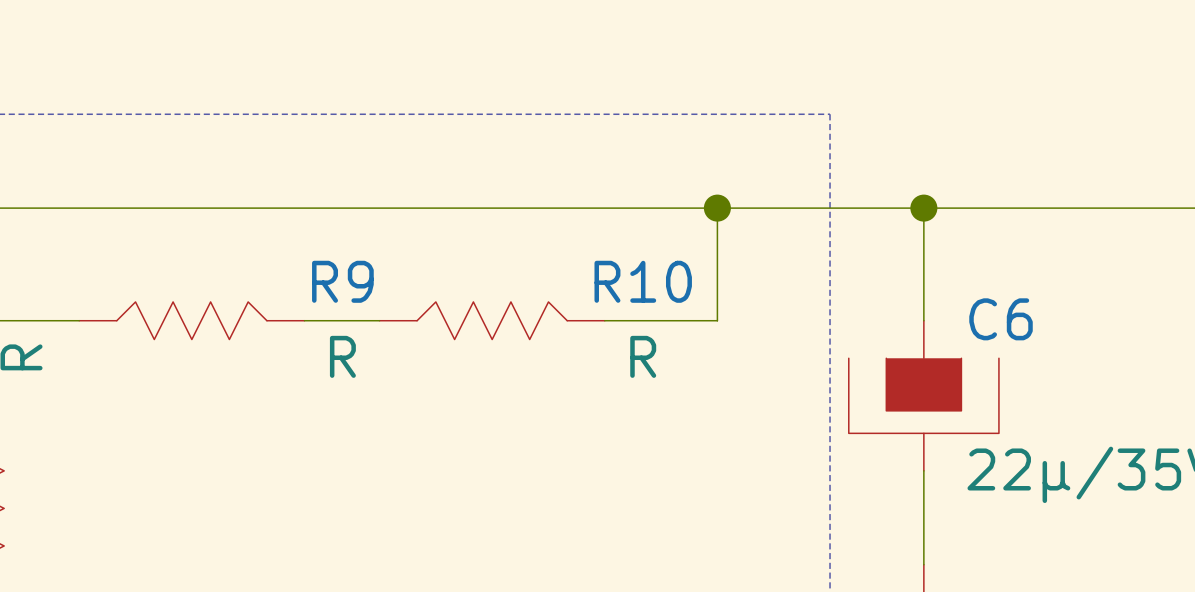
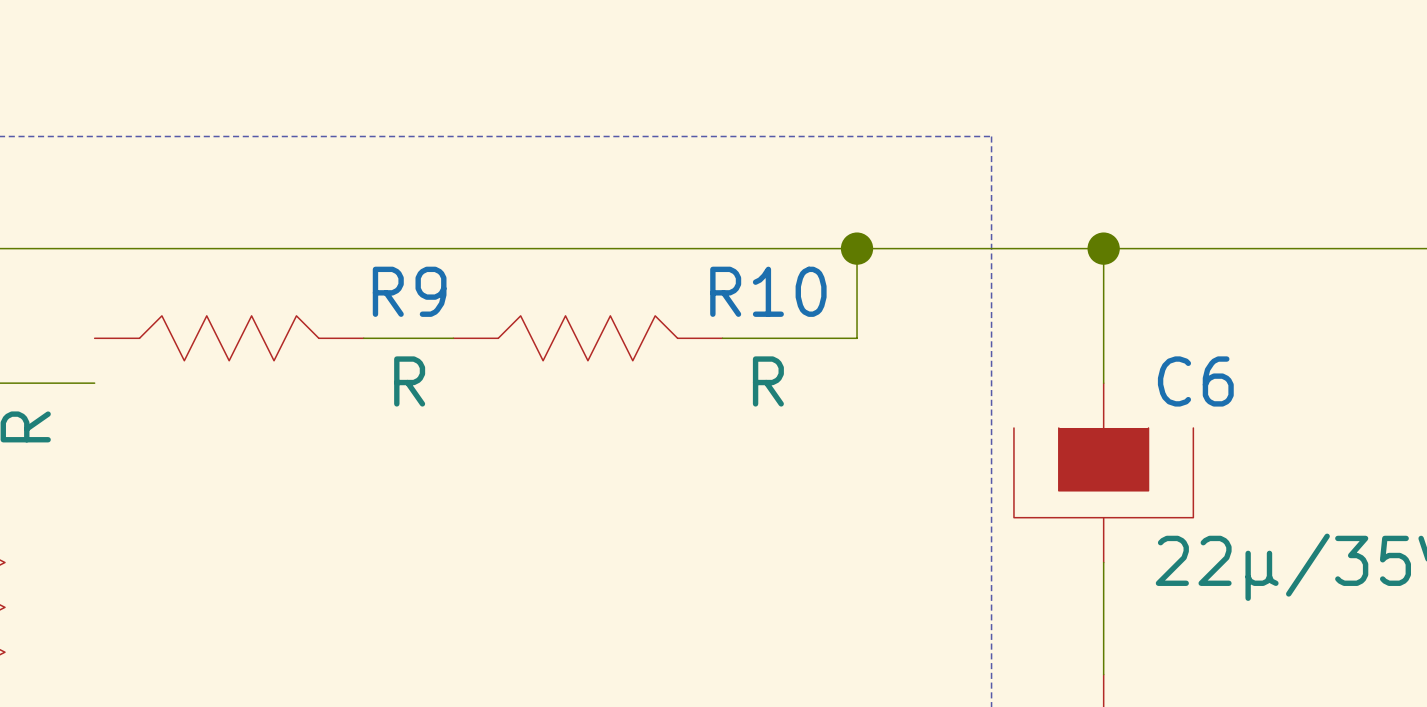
wire: (717, 283) (717, 320) (604, 320) -> (857, 338) (722, 338)
R9 position: (191, 320) -> (229, 338)
wire: (304, 320) (379, 320) -> (363, 338) (453, 338)
R10 position: (492, 320) -> (587, 338)

